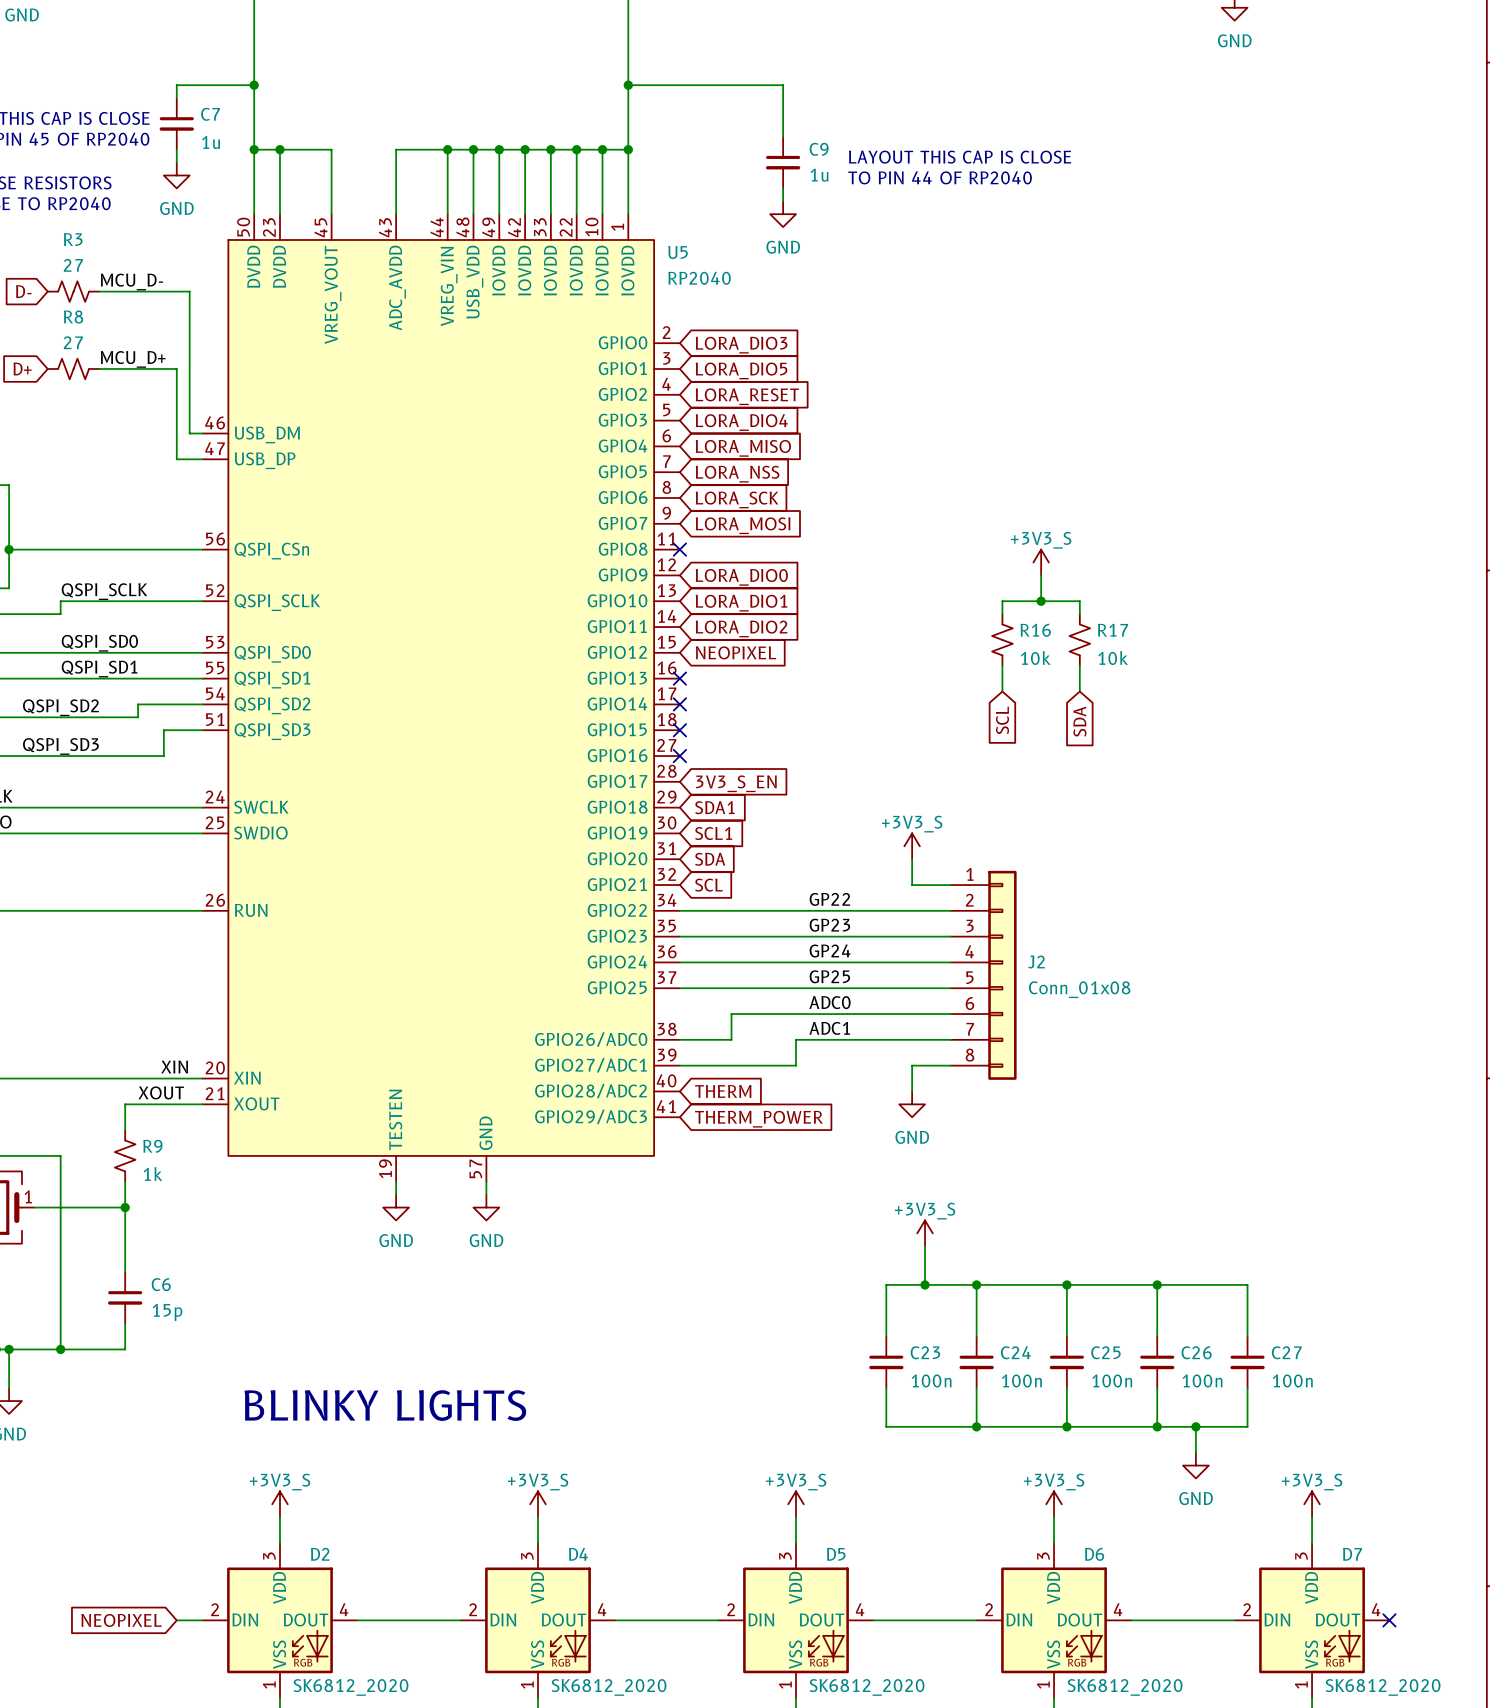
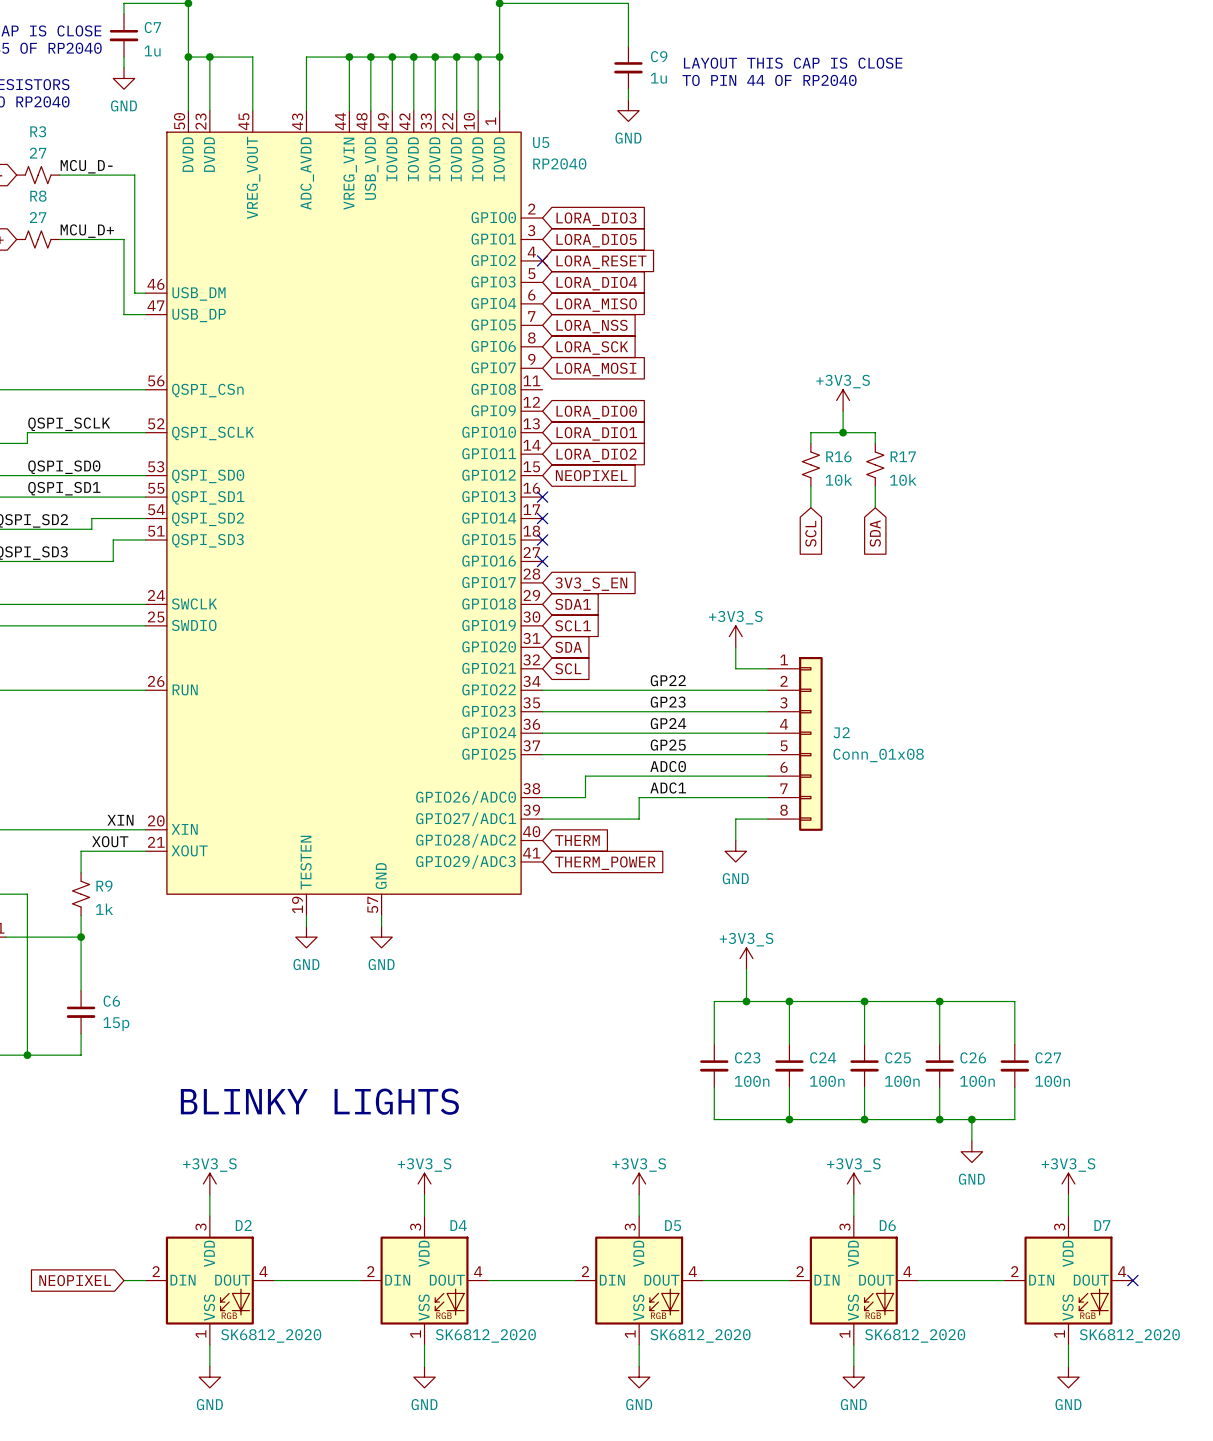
no-connect mark: none -> (542, 260)
no-connect mark: (679, 549) -> none

